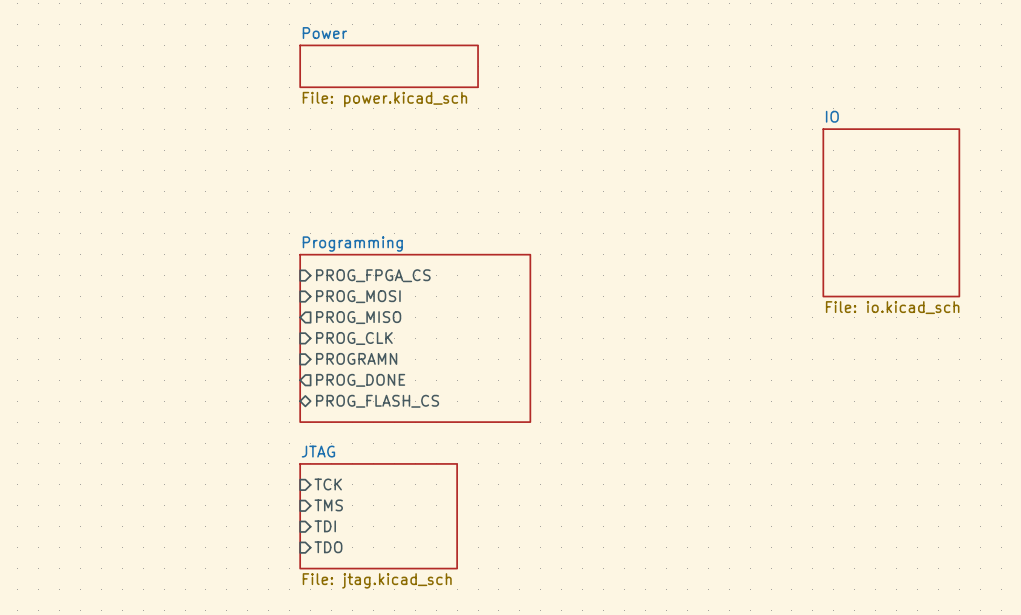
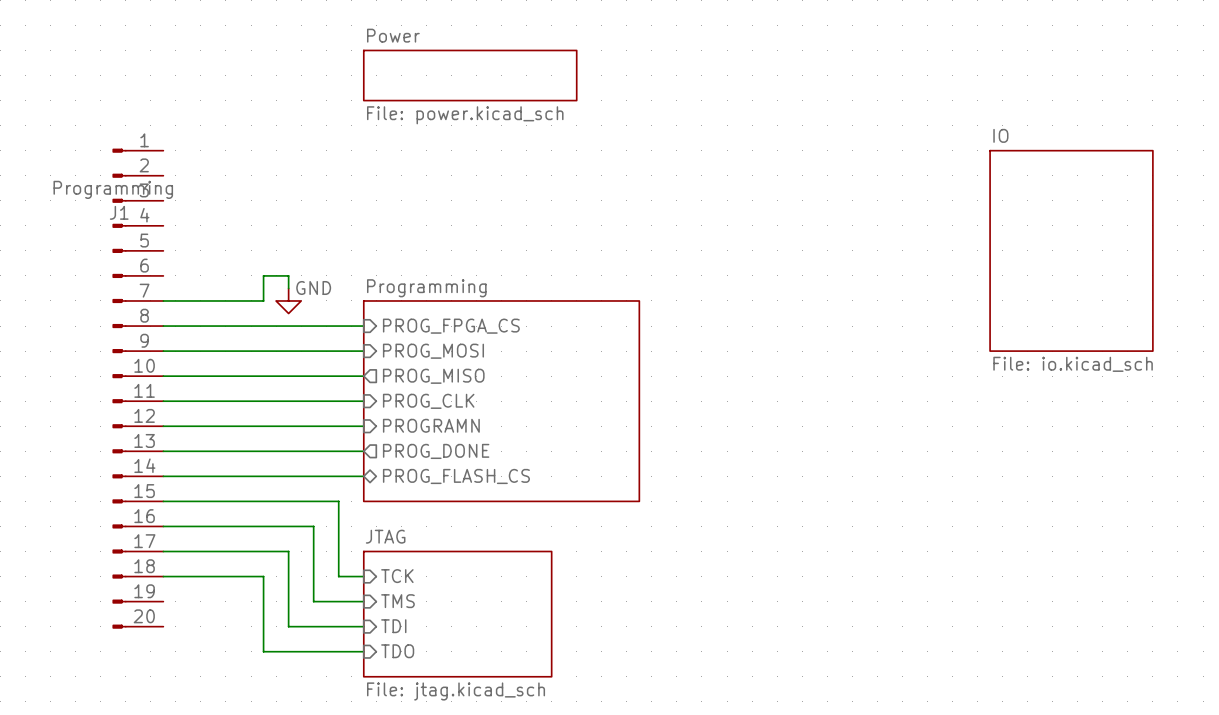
wire: none -> (288, 288) (288, 275) (263, 275) (263, 300) (163, 300)
power symbol: none -> GND (288, 300)
wire: none -> (163, 326) (363, 326)
wire: none -> (163, 351) (363, 351)
wire: none -> (163, 376) (363, 376)
J1: none -> Programming (137, 388)
wire: none -> (163, 401) (363, 401)
wire: none -> (163, 426) (363, 426)
wire: none -> (163, 451) (363, 451)
wire: none -> (163, 476) (363, 476)
wire: none -> (163, 501) (338, 501) (338, 576) (363, 576)
wire: none -> (163, 526) (313, 526) (313, 601) (363, 601)
wire: none -> (163, 551) (288, 551) (288, 626) (363, 626)
wire: none -> (163, 576) (263, 576) (263, 651) (363, 651)

